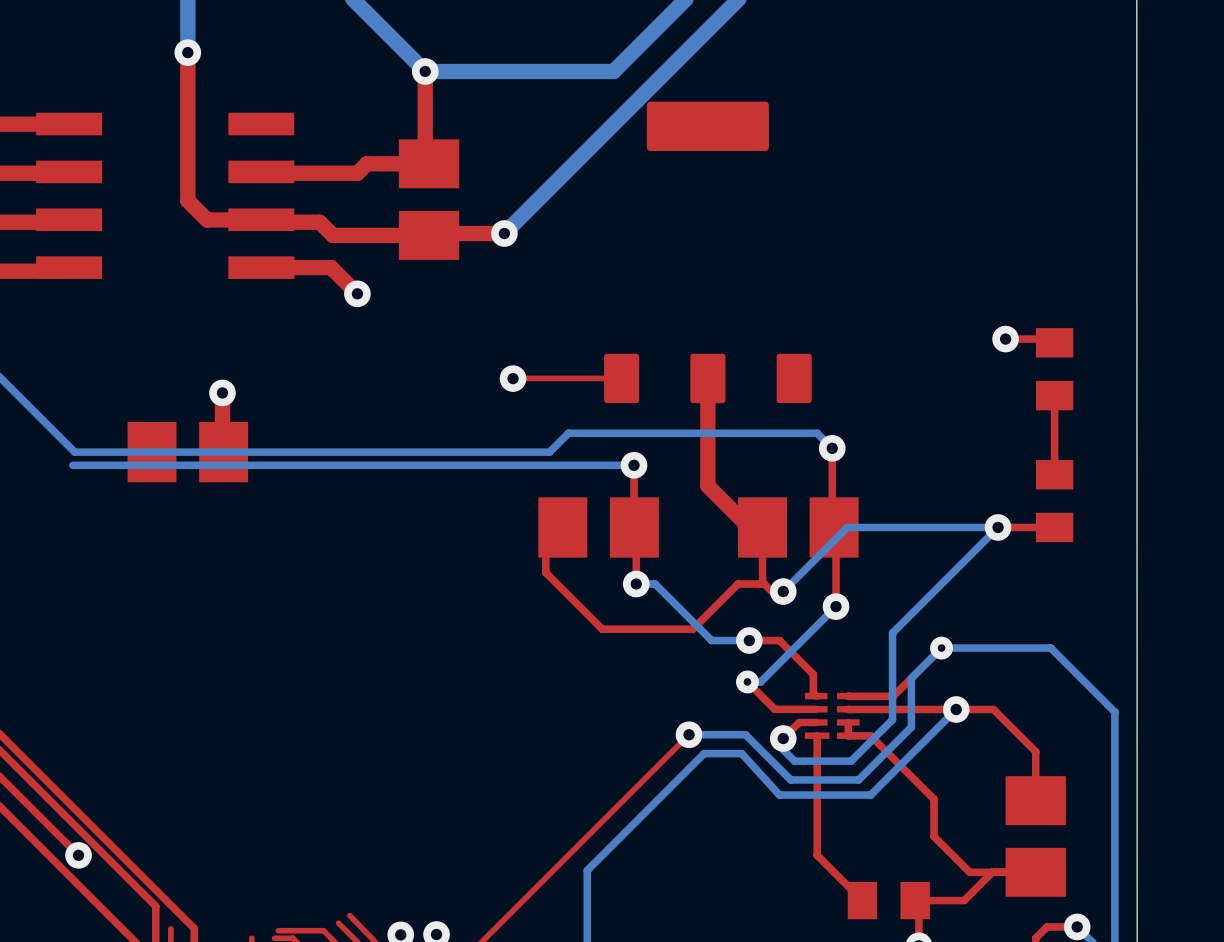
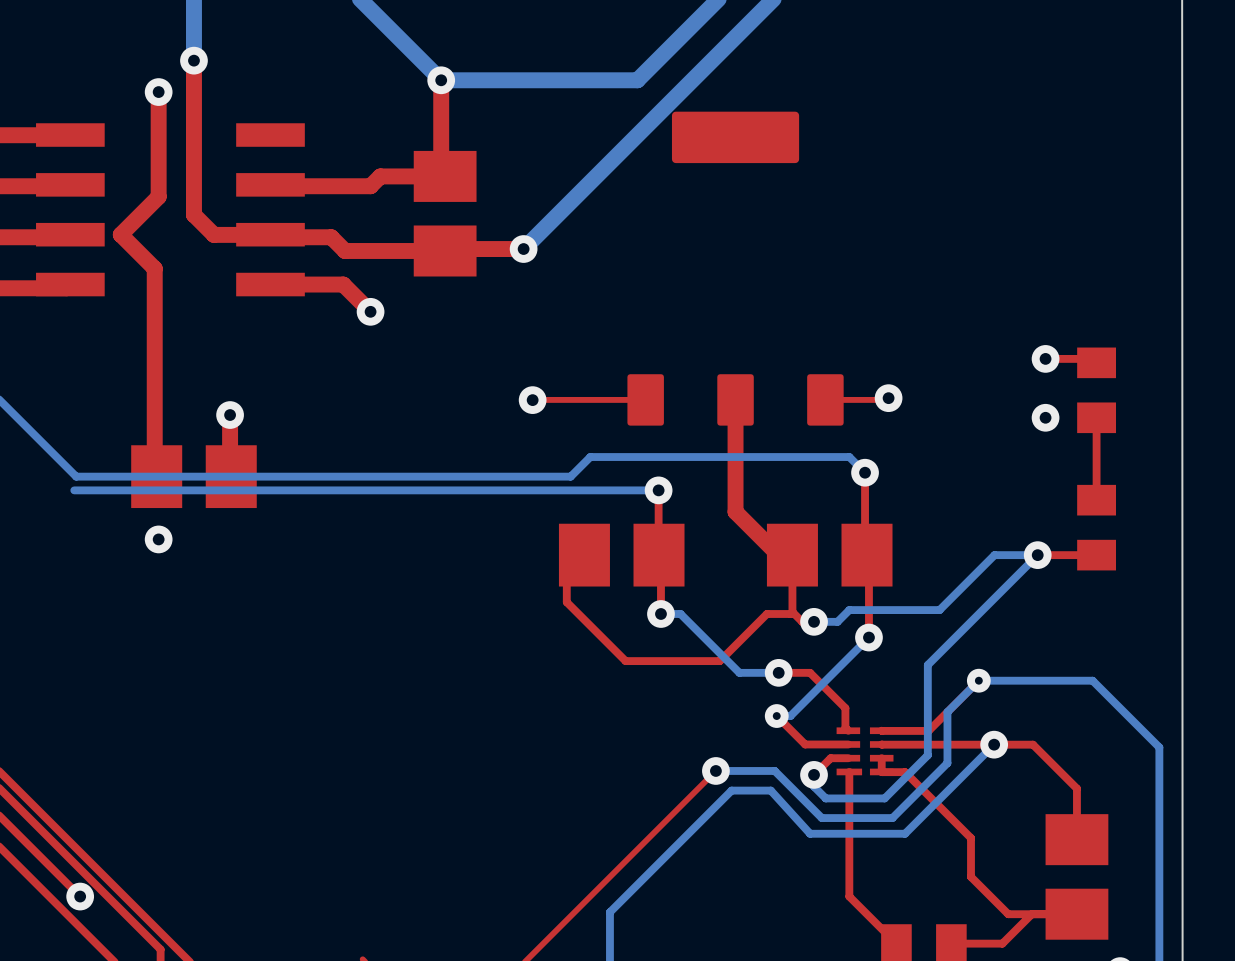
top track: none -> (158, 92) (158, 196) (120, 234) (154, 268) (154, 474) (156, 476)
via: none -> (158, 92)
top track: none -> (888, 398) (886, 399) (825, 399)
via: none -> (888, 398)
via: none -> (1045, 417)
via: none -> (158, 539)
bottom track: (956, 527) (847, 527) (783, 591) -> (994, 555) (939, 610) (849, 610) (837, 621) (814, 621)

